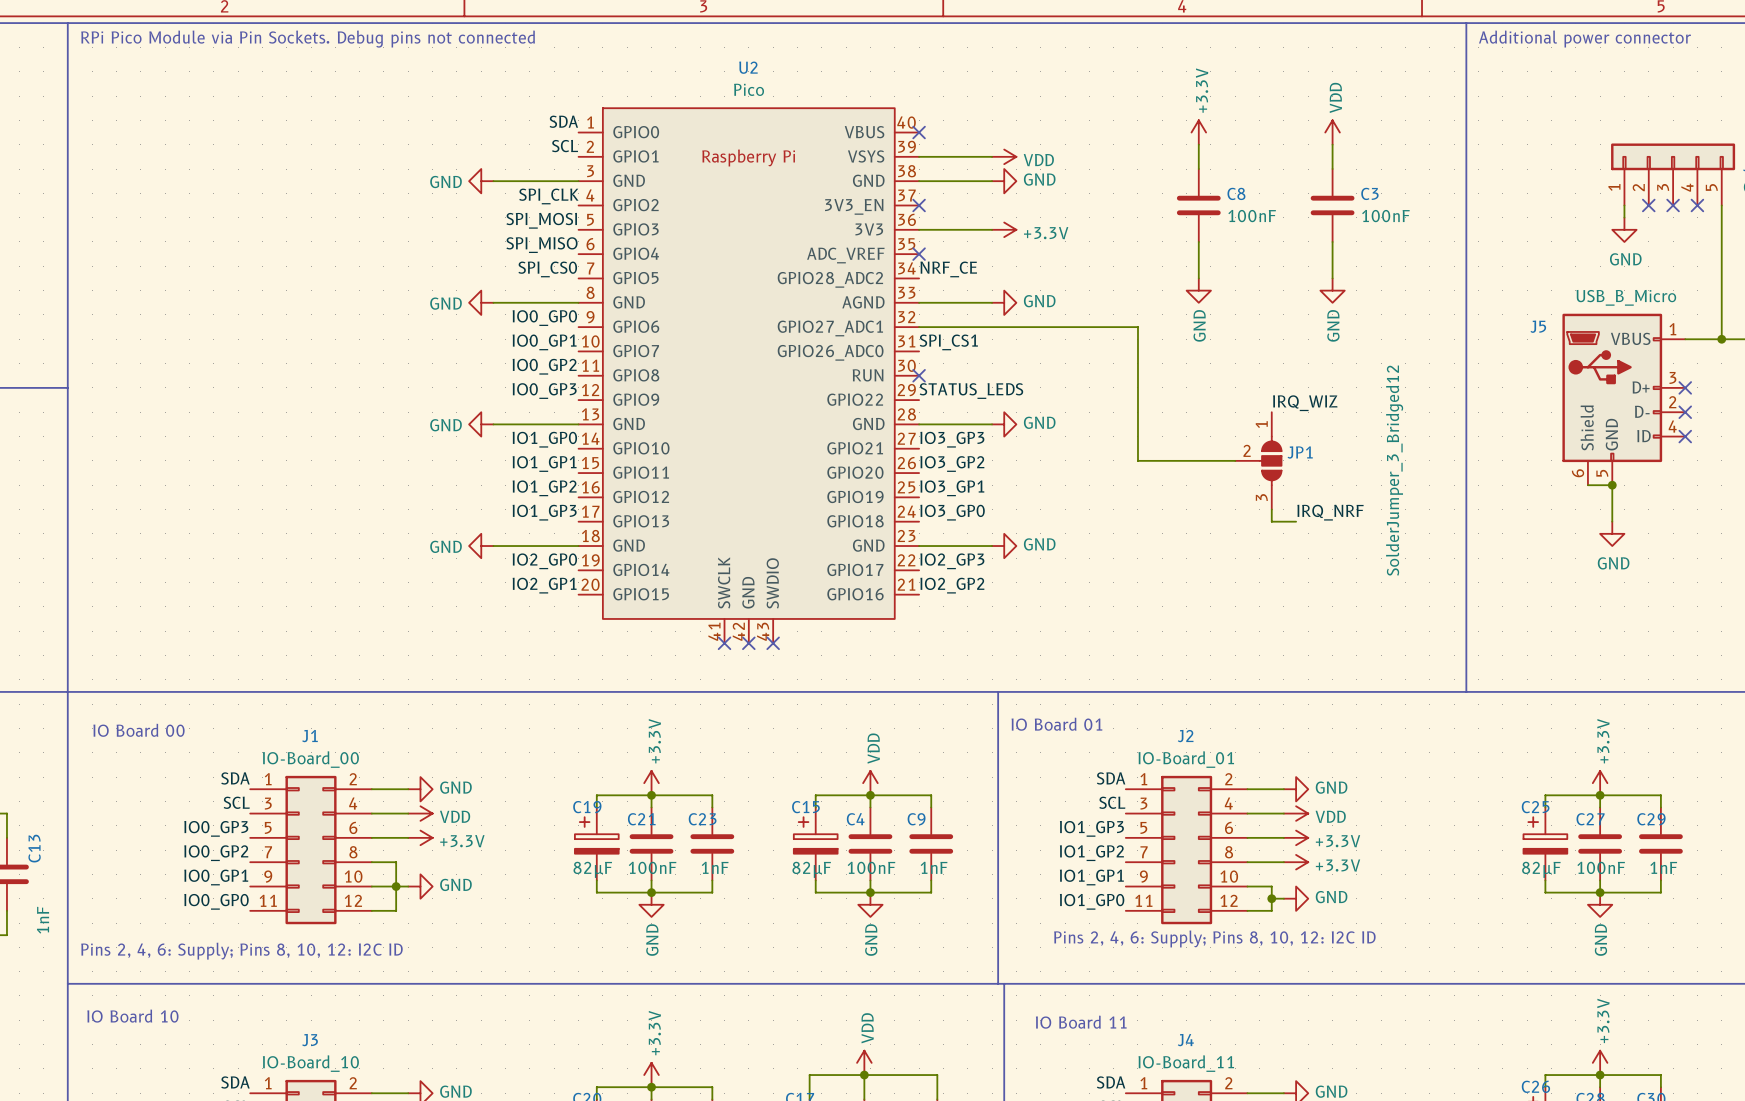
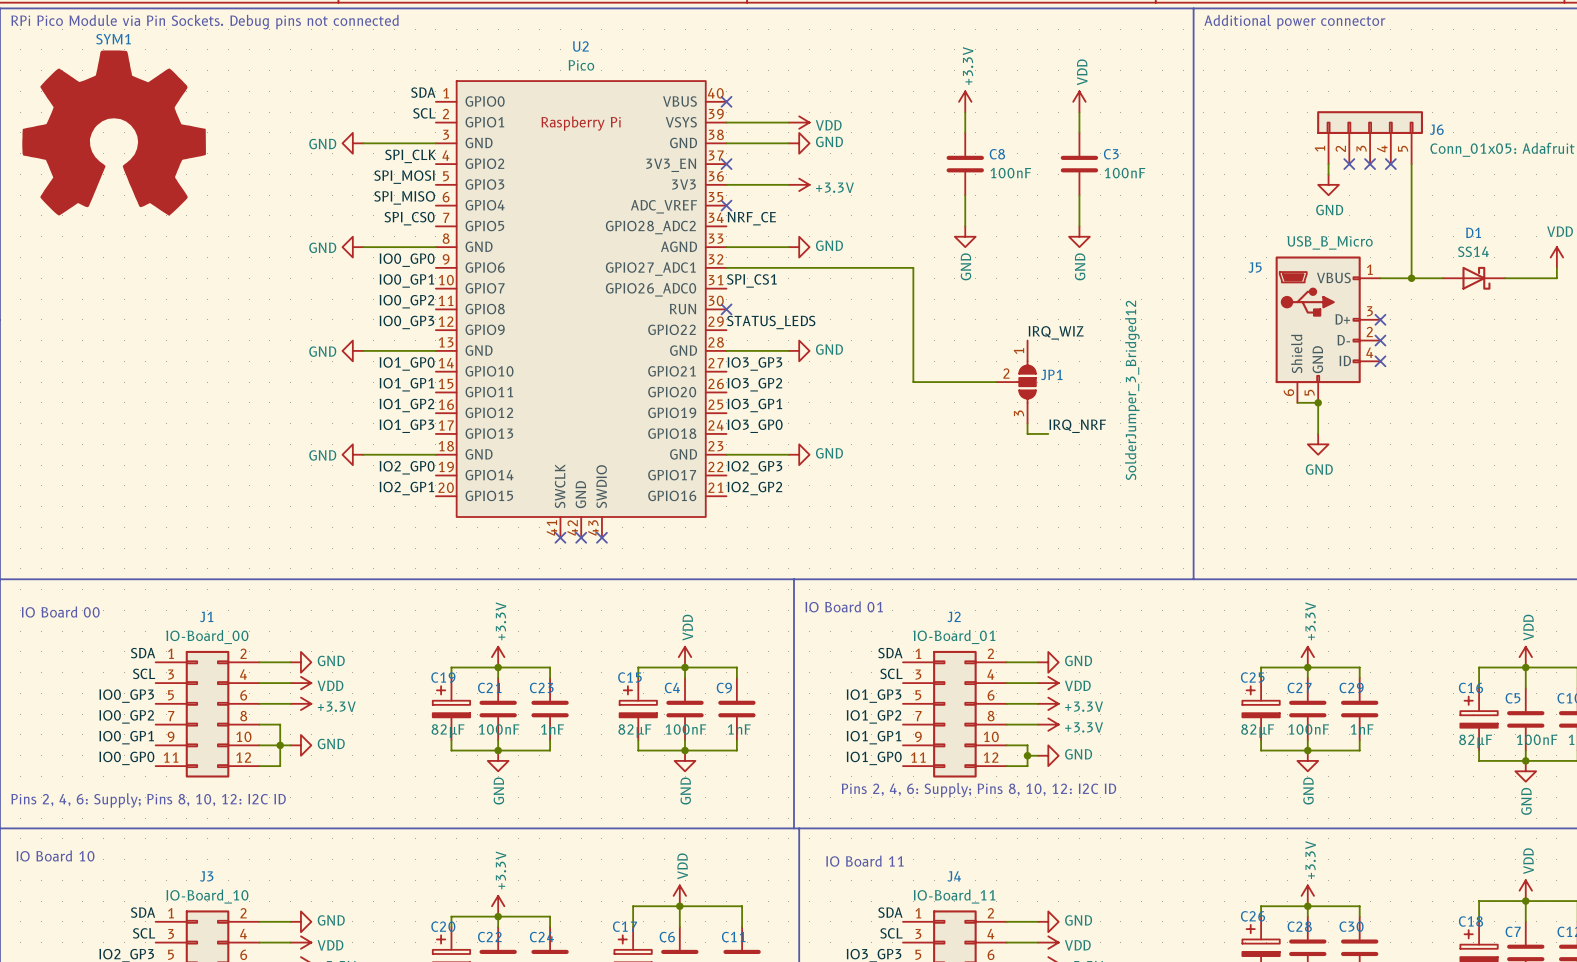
SYM1: none -> (114, 132)

